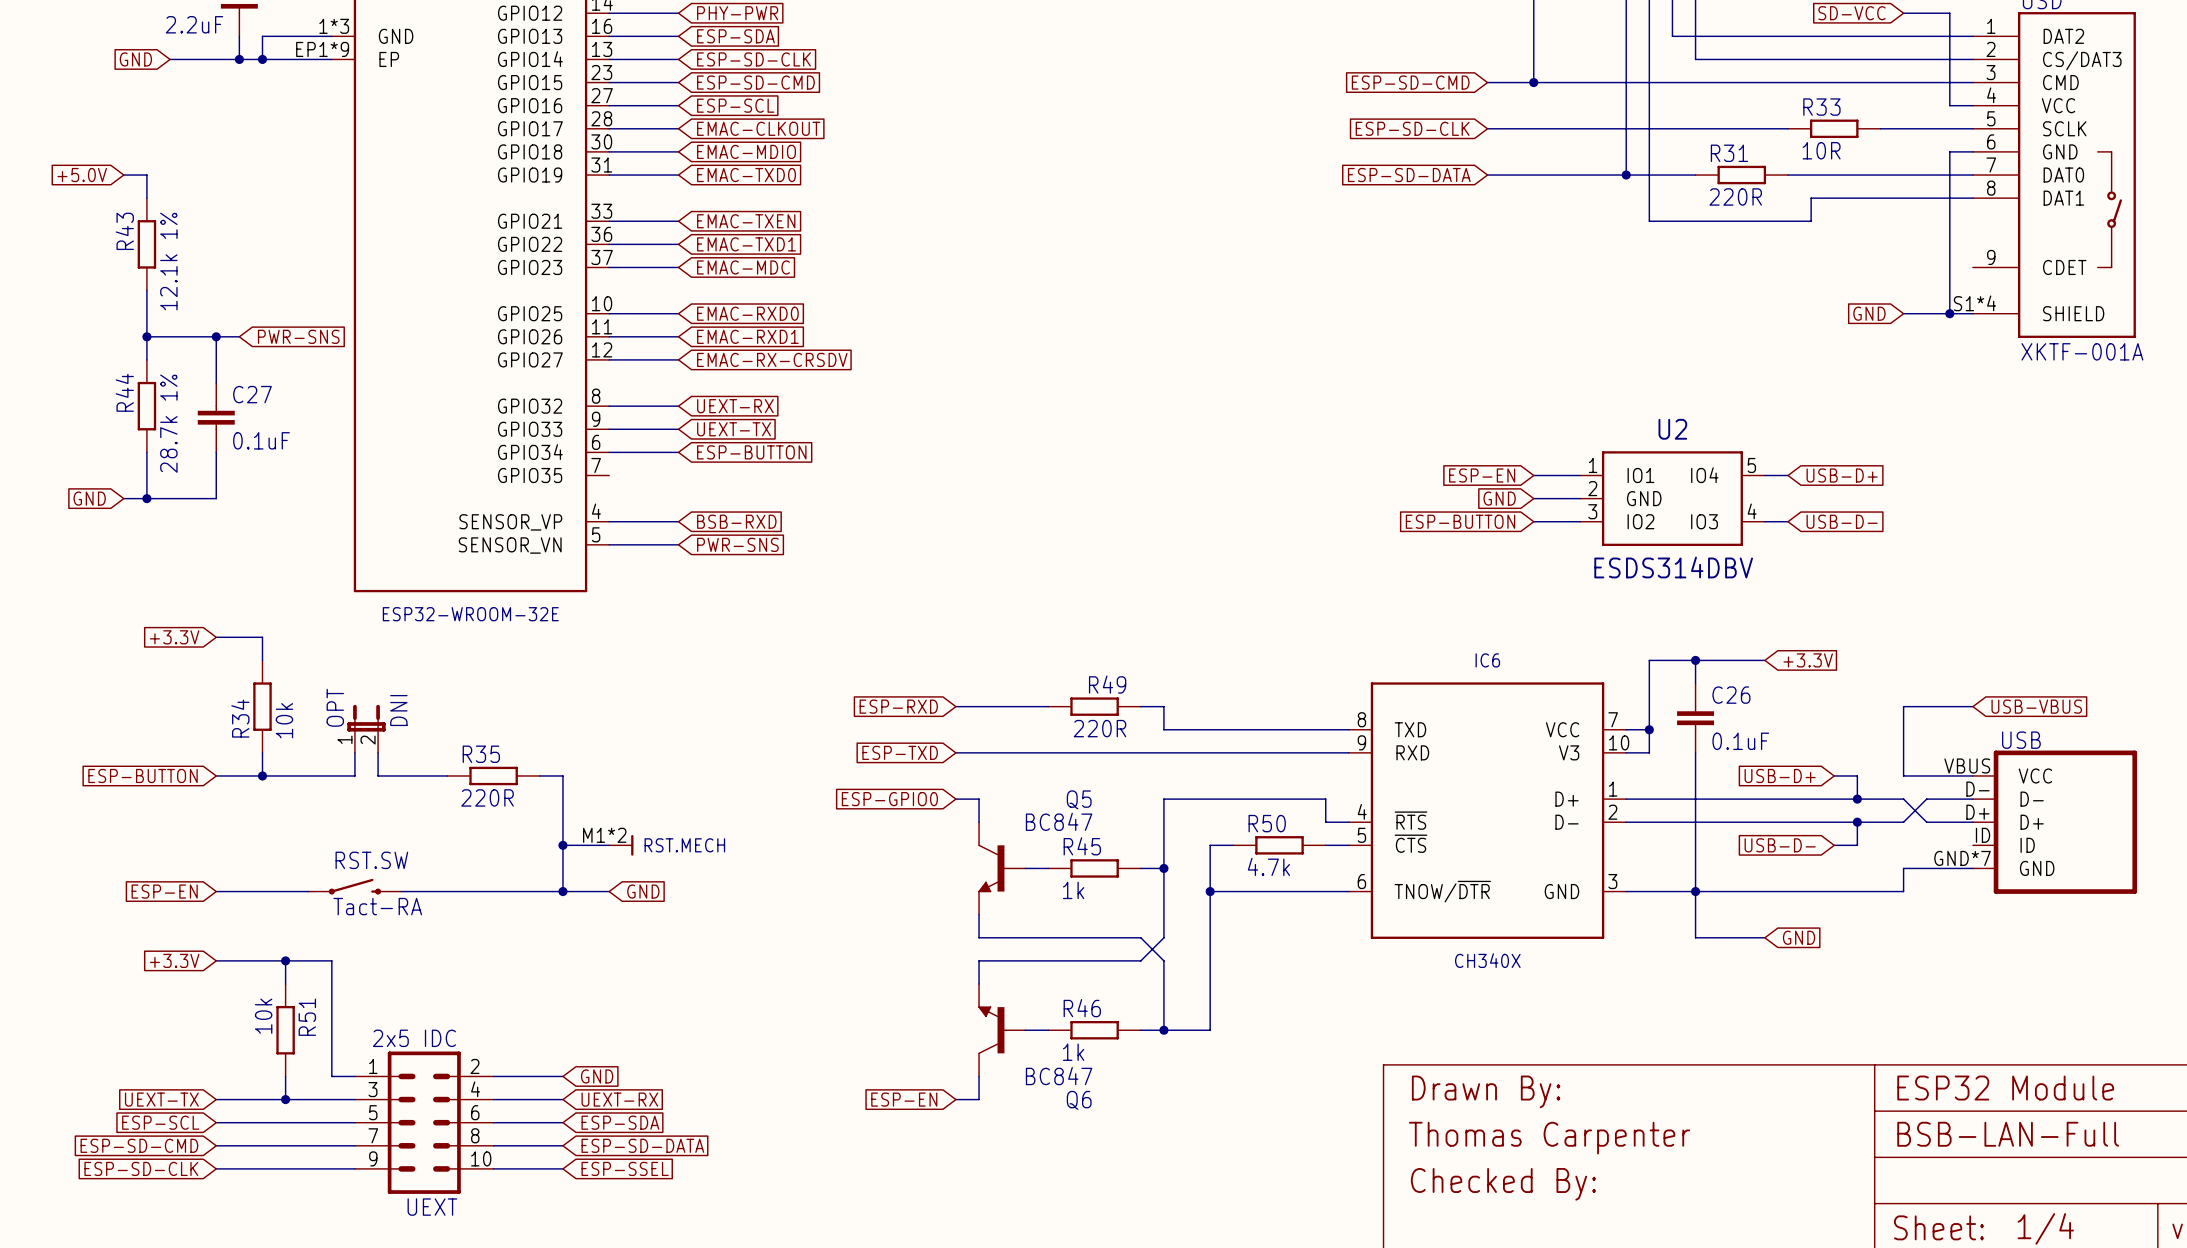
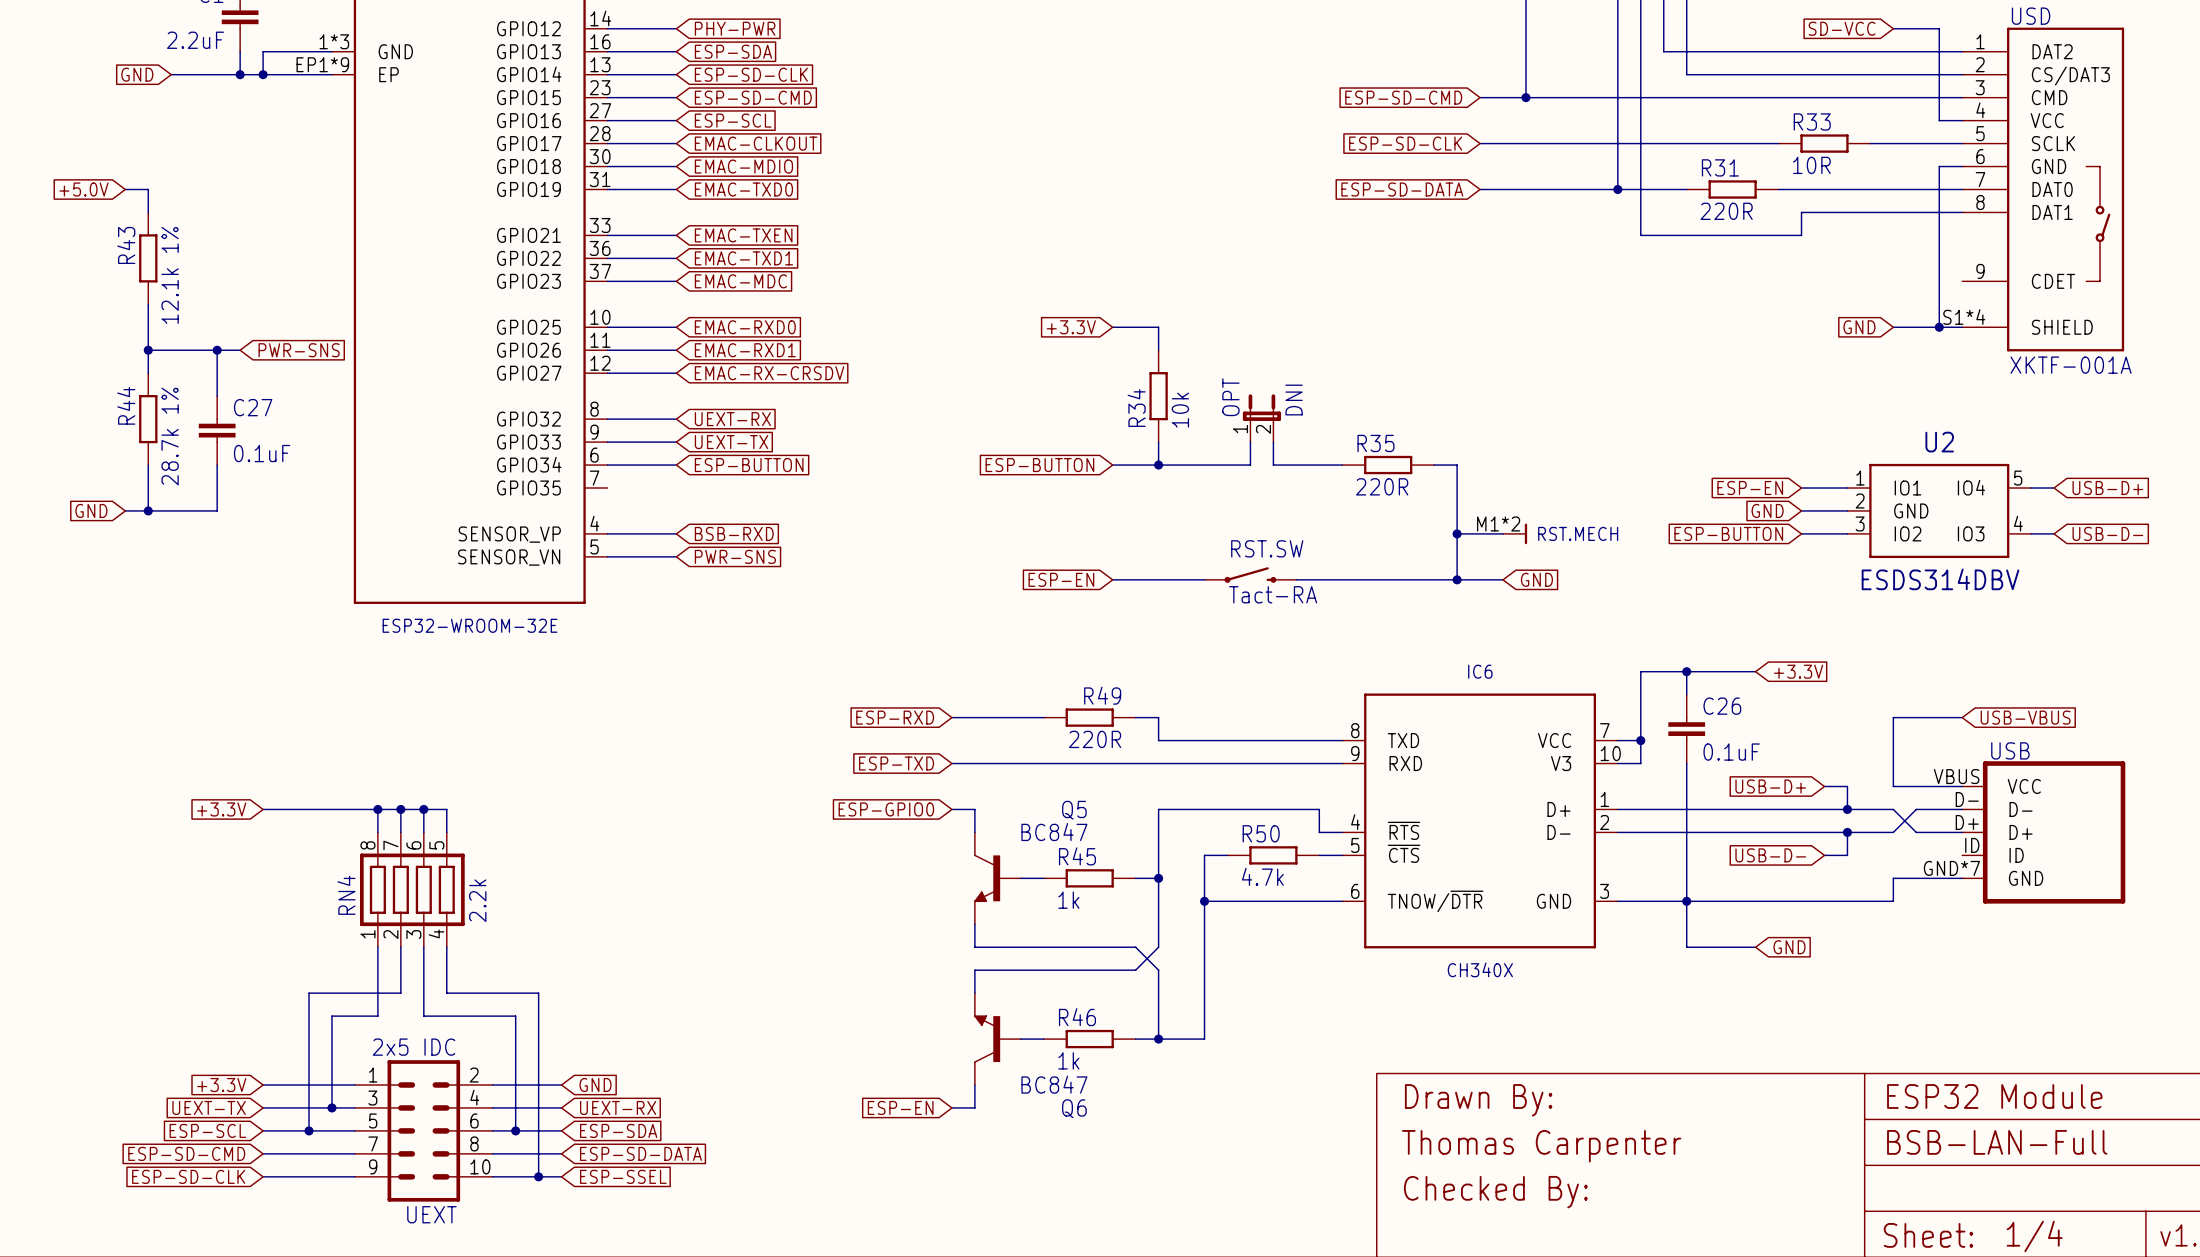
global label: none -> +3.3V (1071, 327)
wire: none -> (1112, 327) (1158, 327) (1158, 350)
OPT: none -> DNI (1261, 418)
wire: none -> (1158, 442) (1158, 465)
wire: none -> (1250, 442) (1250, 465) (1112, 465)
wire: none -> (1273, 442) (1273, 465) (1342, 465)
global label: none -> ESP-BUTTON (1039, 465)
junction: none -> (1158, 465)
wire: none -> (1434, 465) (1457, 465) (1457, 579)
global label: ESP-EN (1482, 475) -> none
wire: (1533, 475) (1579, 475) -> none
global label: none -> ESP-EN (1750, 488)
wire: (1764, 475) (1788, 475) -> none
wire: none -> (1801, 488) (1847, 488)
global label: USB-D+ (1842, 475) -> none
wire: none -> (2031, 488) (2054, 488)
global label: none -> USB-D+ (2107, 488)
global label rotation: 0° (1499, 498) -> 180° (1536, 579)
global label position: GND (1499, 498) -> GND (1536, 579)
wire: (1533, 498) (1579, 498) -> none
U2 position: (1672, 498) -> (1939, 510)
global label: none -> GND (1767, 510)
wire: none -> (1801, 510) (1847, 510)
global label: ESP-BUTTON (1460, 521) -> none
junction: none -> (1457, 533)
RST.MECH: none -> (1515, 533)
wire: (1533, 521) (1579, 521) -> (1457, 533) (1503, 533)
global label: none -> ESP-BUTTON (1728, 533)
wire: (1764, 521) (1788, 521) -> none
wire: none -> (1801, 533) (1847, 533)
global label: USB-D- (1842, 521) -> none
wire: none -> (2031, 533) (2054, 533)
global label: none -> USB-D- (2107, 533)
RST.SW: none -> Tact-RA (1250, 575)
global label: none -> ESP-EN (1061, 579)
wire: none -> (1112, 579) (1204, 579)
wire: none -> (1296, 579) (1503, 579)
junction: none -> (1457, 579)
global label: +3.3V (174, 637) -> none
wire: (216, 637) (262, 637) (262, 660) -> none
R34 position: (262, 706) -> (1158, 396)
OPT: DNI (366, 728) -> none
wire: (262, 752) (262, 775) -> (377, 809) (377, 832)
wire: (354, 752) (354, 775) (216, 775) -> none
wire: (378, 752) (378, 775) (447, 775) -> none
global label: ESP-BUTTON (143, 775) -> none
junction: (262, 775) -> none
R35 position: (493, 775) -> (1388, 465)
wire: (539, 775) (562, 775) (562, 891) -> none
global label: none -> +3.3V (221, 809)
wire: none -> (263, 809) (446, 809) (446, 832)
junction: none -> (377, 809)
junction: none -> (400, 809)
wire: none -> (423, 809) (423, 832)
junction: none -> (423, 809)
wire: (562, 845) (609, 845) -> none
junction: (562, 845) -> none
RST.MECH: (621, 845) -> none
RN4: none -> 2.2k (412, 889)
RST.SW: Tact-RA (354, 886) -> none
global label: ESP-EN (164, 891) -> none
wire: (216, 891) (308, 891) -> none
wire: (401, 891) (609, 891) -> none
junction: (562, 891) -> none
global label: GND (643, 891) -> none
wire: none -> (400, 947) (400, 993) (309, 993) (309, 1130)
wire: none -> (423, 947) (423, 1016) (515, 1016) (515, 1130)
wire: none -> (446, 947) (446, 993) (538, 993) (538, 1176)
global label: +3.3V (174, 960) -> none
wire: (216, 960) (331, 960) (331, 1007) -> (377, 947) (377, 1016) (331, 1016)
wire: (285, 960) (285, 984) -> (400, 809) (400, 832)
junction: (285, 960) -> none
R51: 10k (285, 1030) -> none
global label: none -> +3.3V (221, 1085)
wire: none -> (263, 1085) (331, 1085) (331, 1107)
wire: (285, 1076) (285, 1099) -> none
global label position: UEXT-TX (161, 1099) -> UEXT-TX (209, 1107)
wire: (216, 1099) (262, 1099) -> none
junction: (285, 1099) -> none
junction: none -> (331, 1107)
global label position: ESP-SCL (160, 1122) -> ESP-SCL (207, 1130)
wire: (216, 1122) (262, 1122) -> none
junction: none -> (309, 1130)
junction: none -> (515, 1130)
global label position: ESP-SD-CMD (139, 1145) -> ESP-SD-CMD (186, 1153)
wire: (216, 1145) (262, 1145) -> none
global label position: ESP-SD-CLK (141, 1168) -> ESP-SD-CLK (188, 1176)
wire: (216, 1168) (262, 1168) -> none
junction: none -> (538, 1176)

